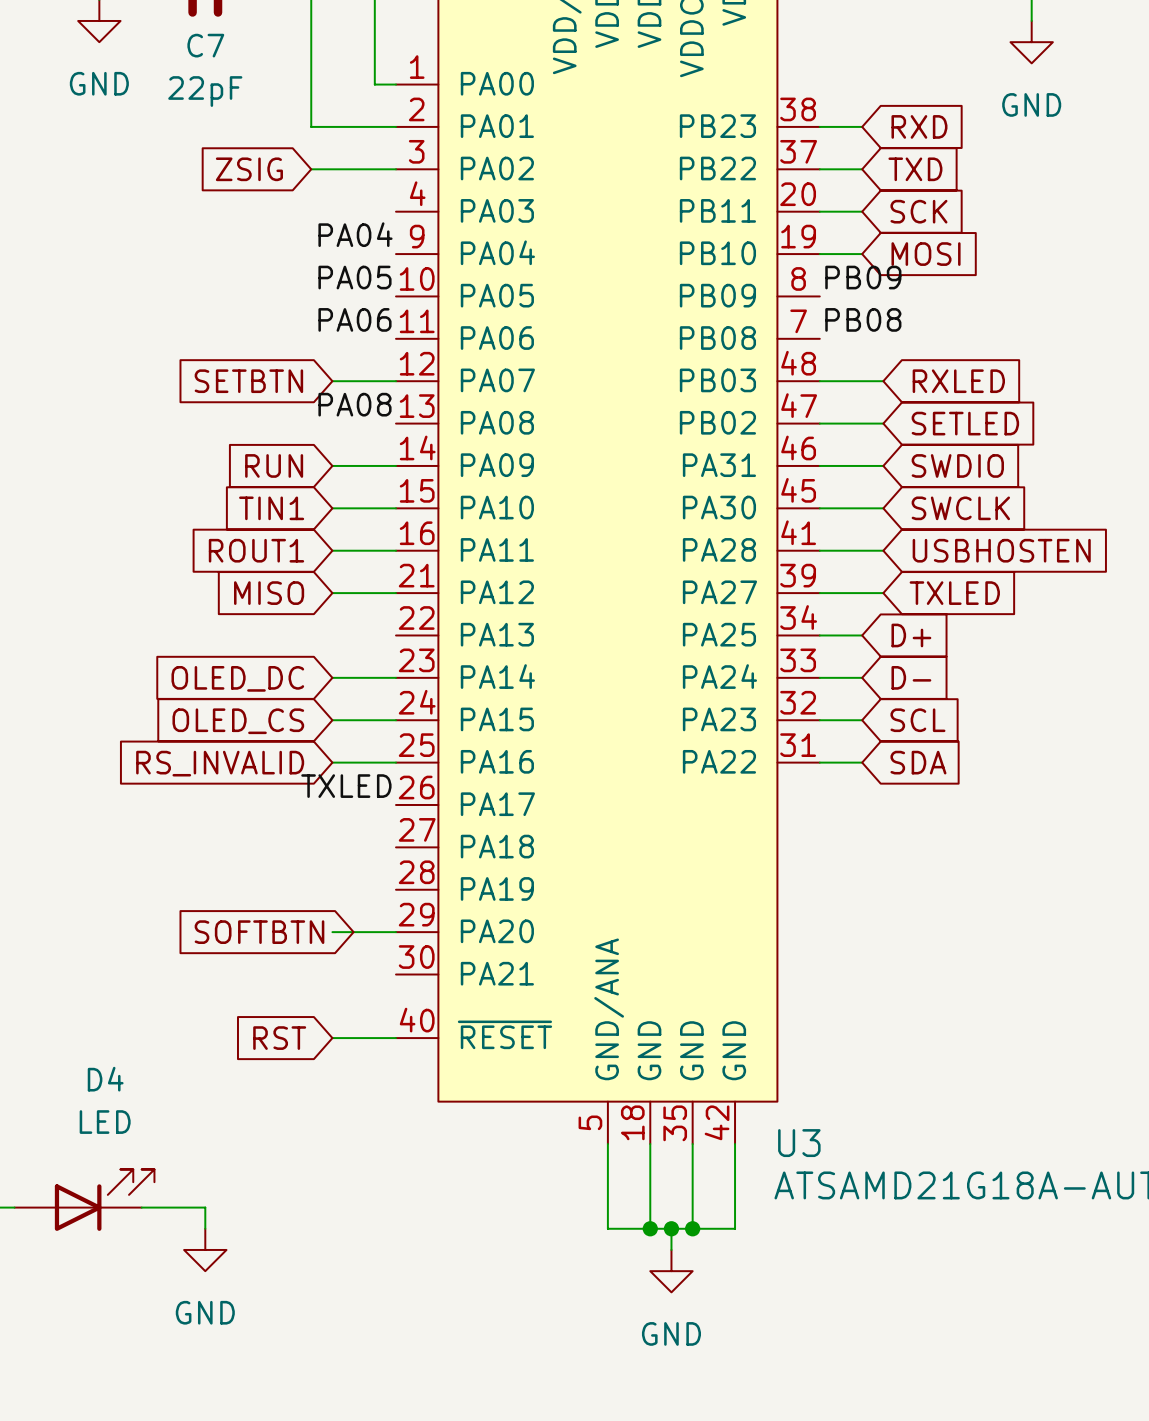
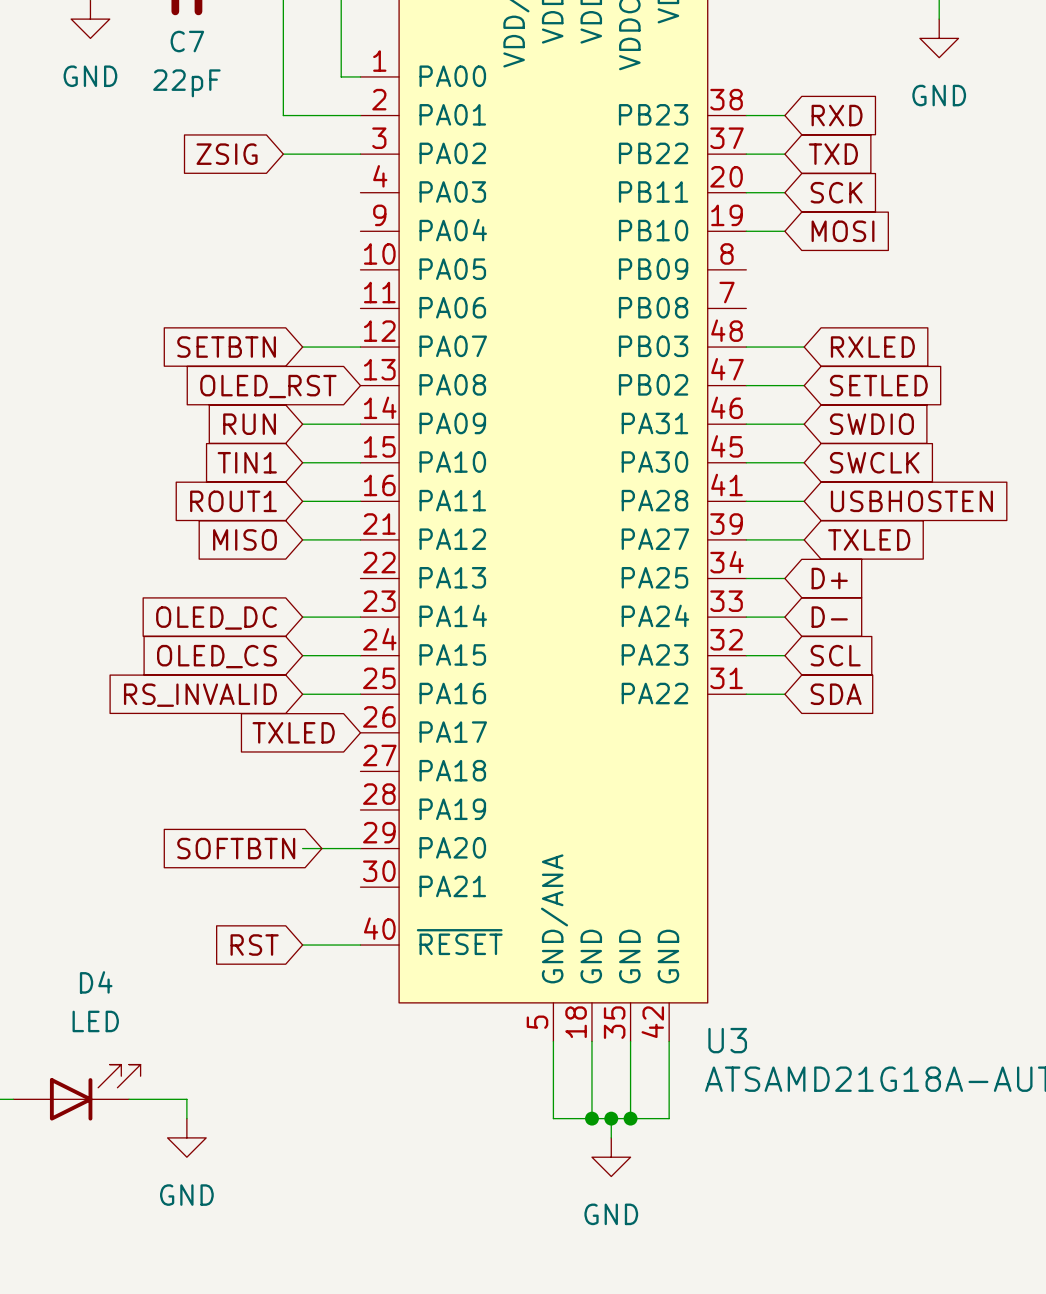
label: PA04 (355, 234) -> none
label: PA05 (354, 277) -> none
label: PB09 (863, 277) -> none
label: PA06 (354, 319) -> none
label: PB08 (863, 319) -> none
label: PA08 (354, 404) -> none
global label: none -> OLED_RST (268, 386)
label: TXLED (346, 786) -> none
global label: none -> TXLED (293, 732)

